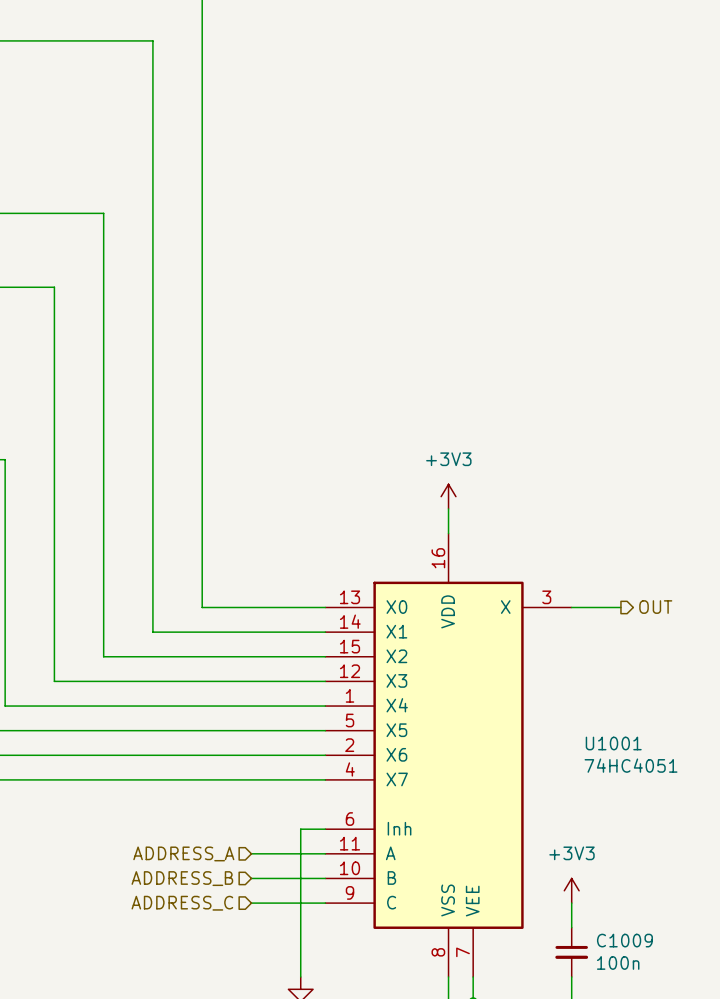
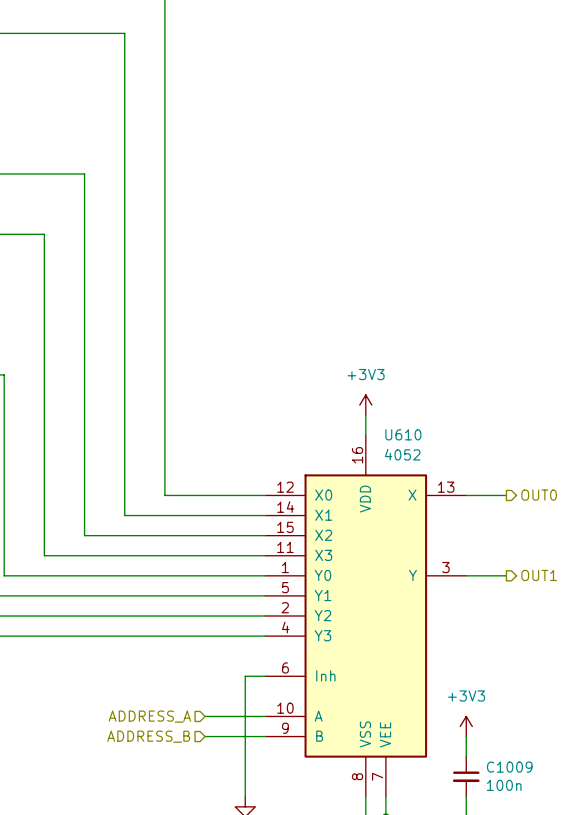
hierarchical label: OUT (655, 607) -> OUT0 (539, 495)
hierarchical label: none -> OUT1 (539, 575)
wire: none -> (466, 575) (506, 575)
U1001: 74HC4051 (448, 755) -> none
U610: none -> 4052 (365, 616)
hierarchical label: ADDRESS_A (183, 853) -> none
wire: (251, 853) (325, 853) -> none
hierarchical label: ADDRESS_B (182, 878) -> ADDRESS_A (149, 716)
hierarchical label: ADDRESS_C (182, 903) -> ADDRESS_B (148, 736)

